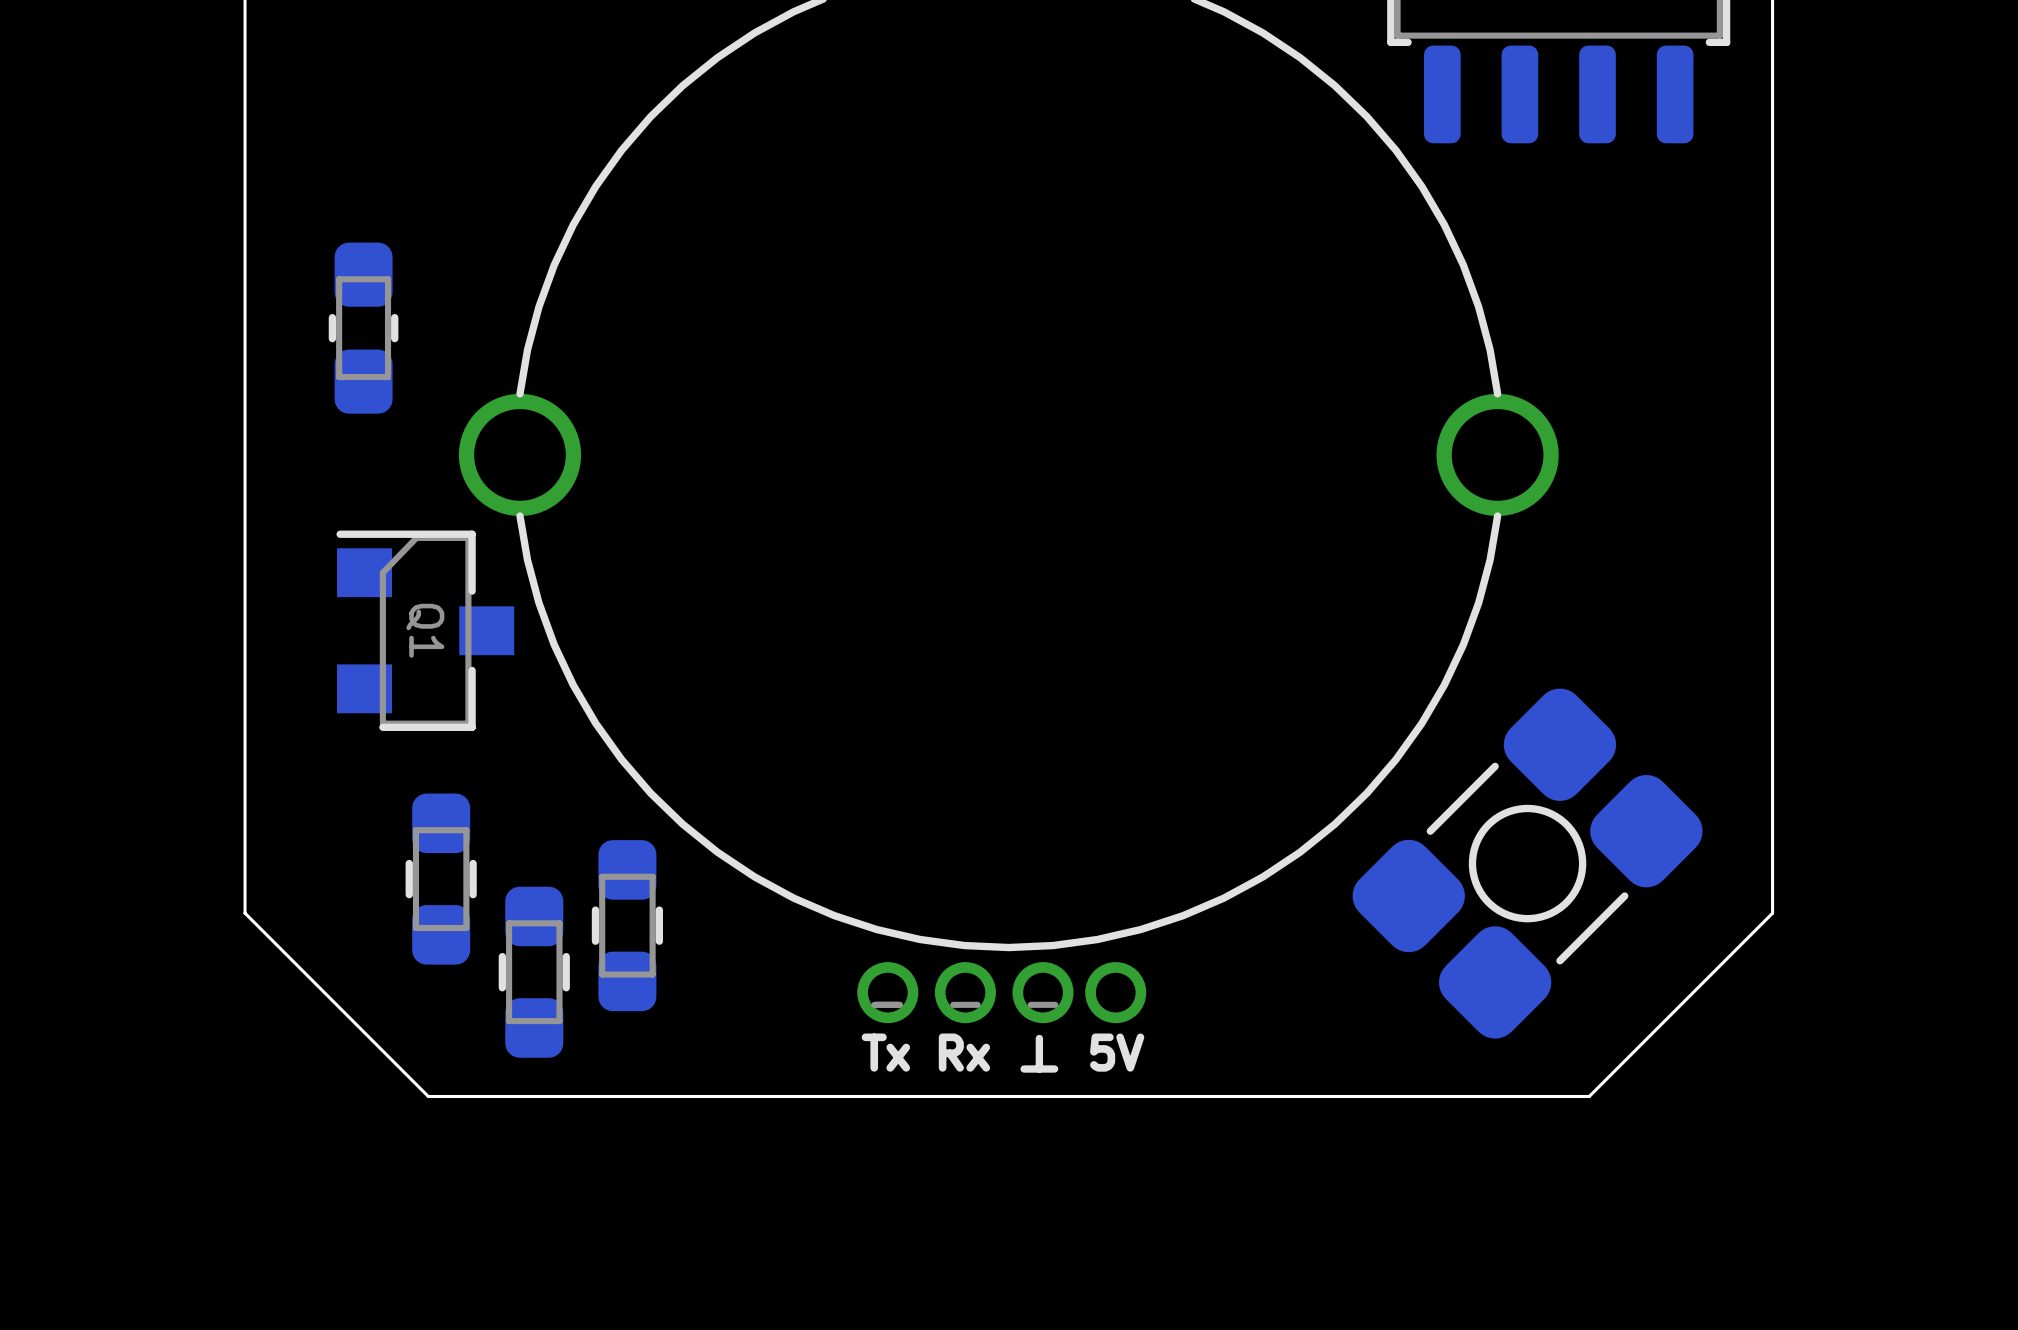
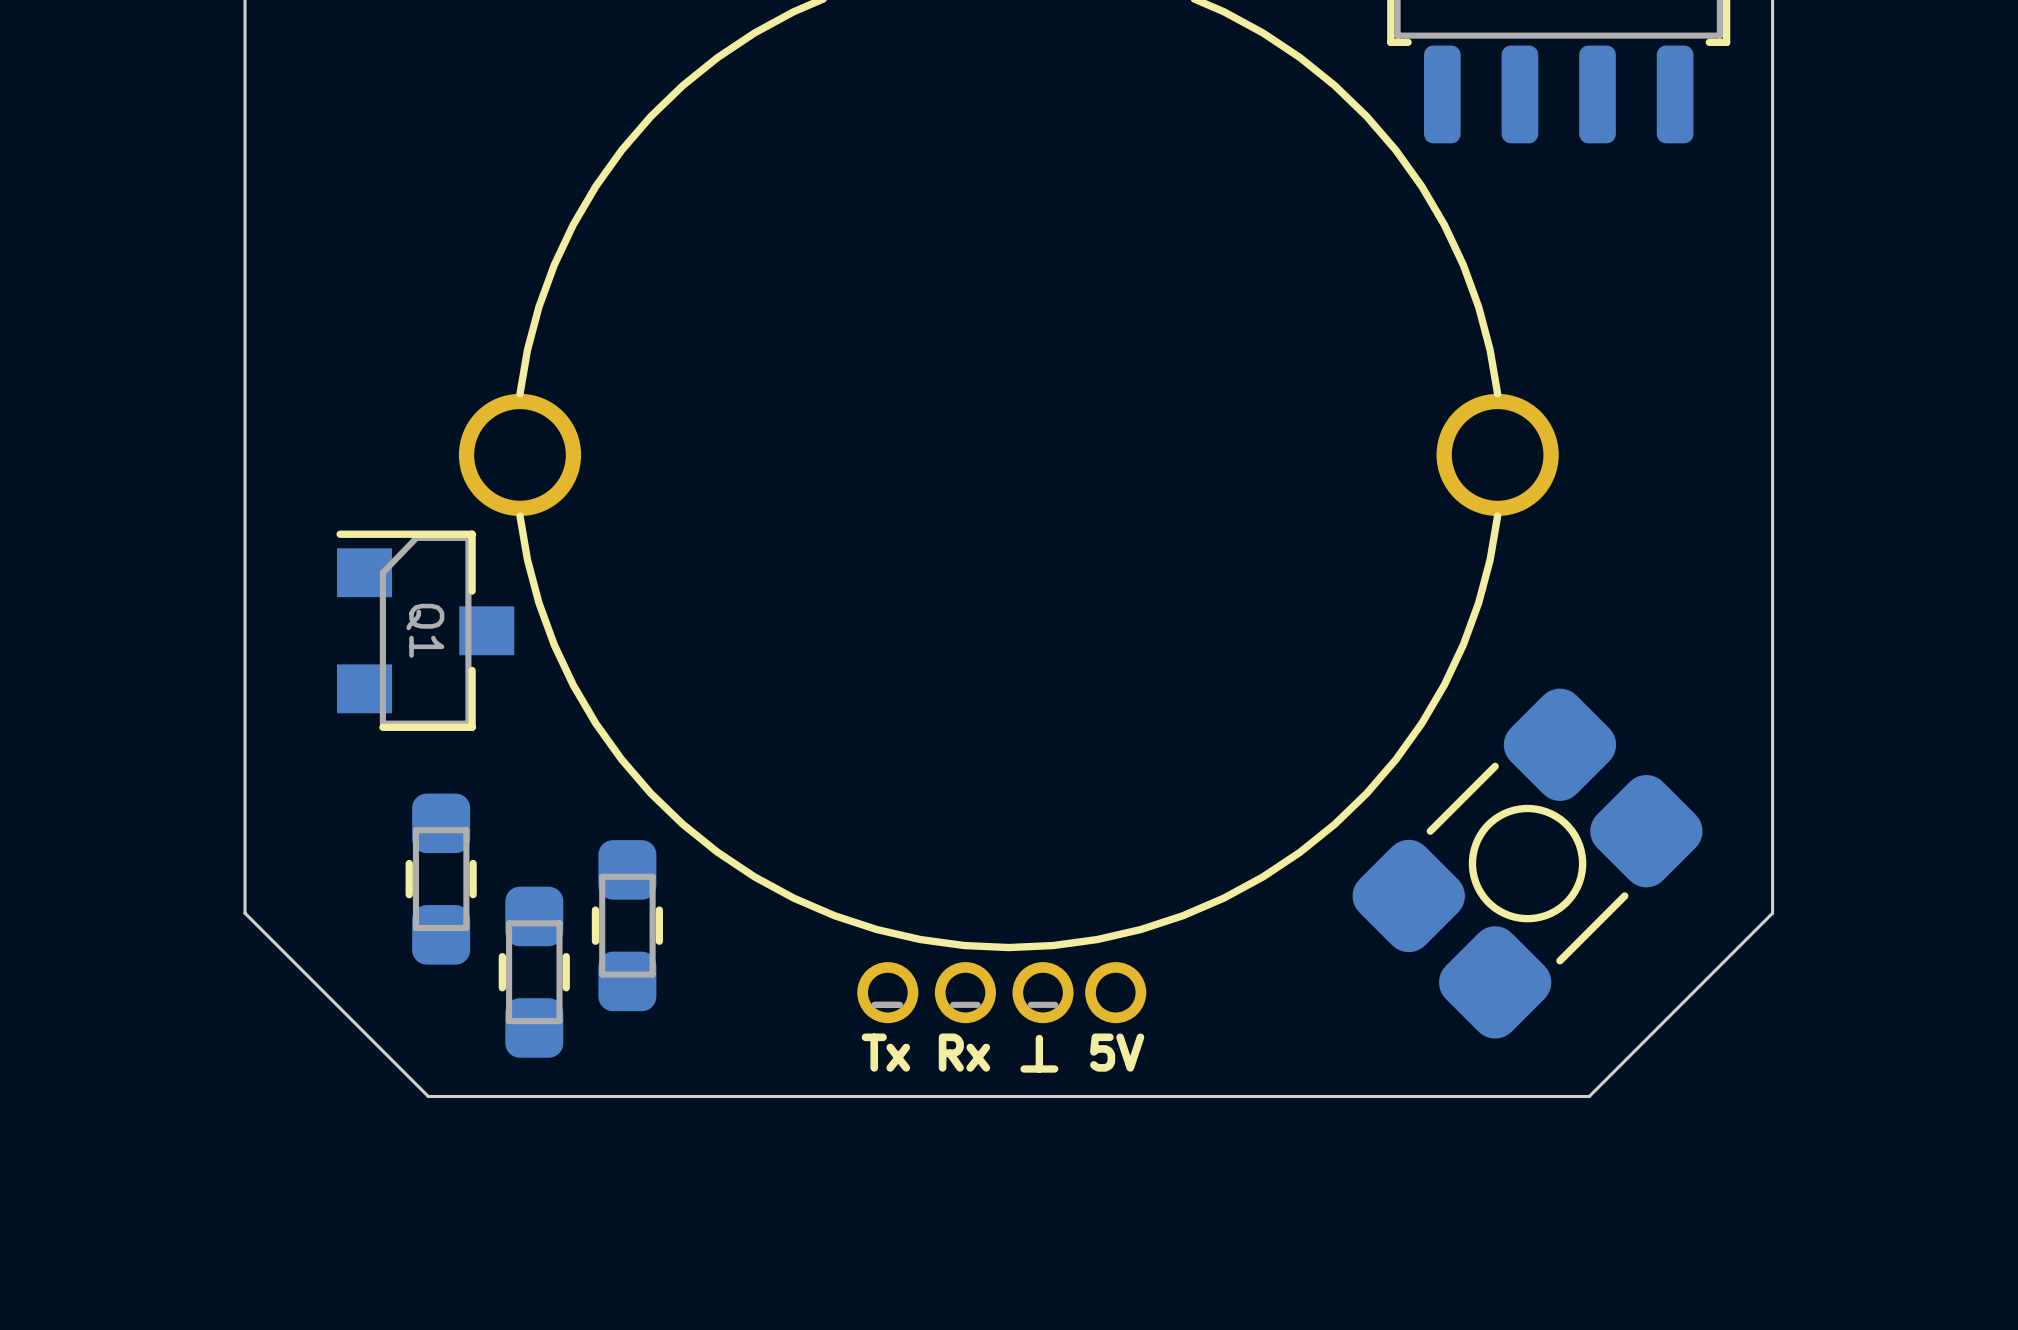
part: (363, 328) -> none

